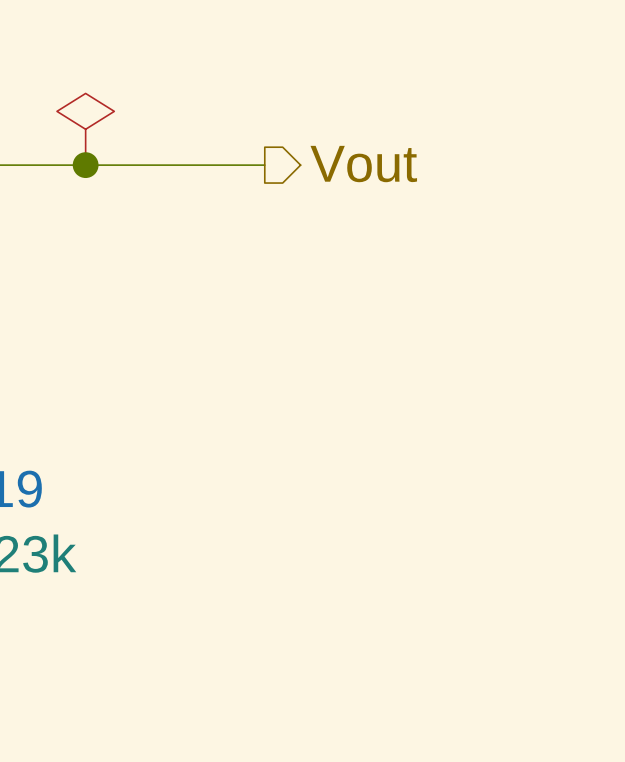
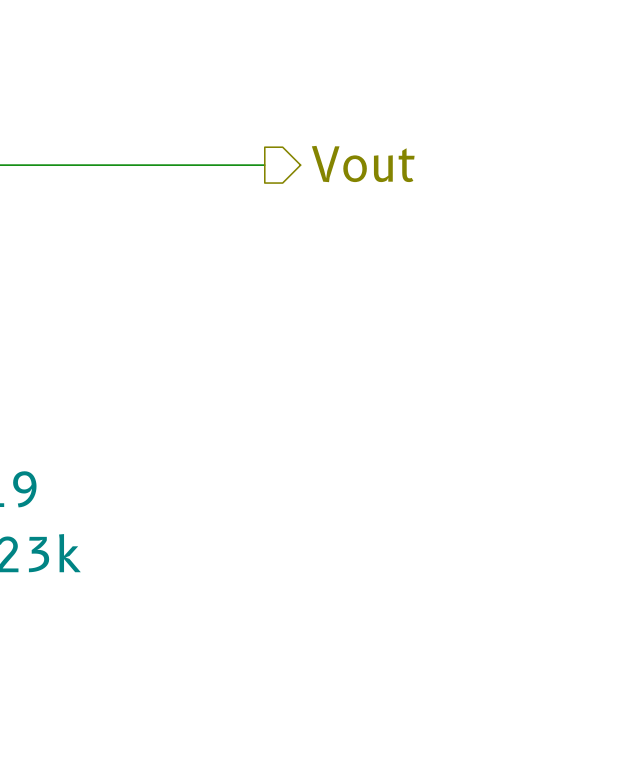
power symbol: (85, 129) -> none
junction: (85, 165) -> none

